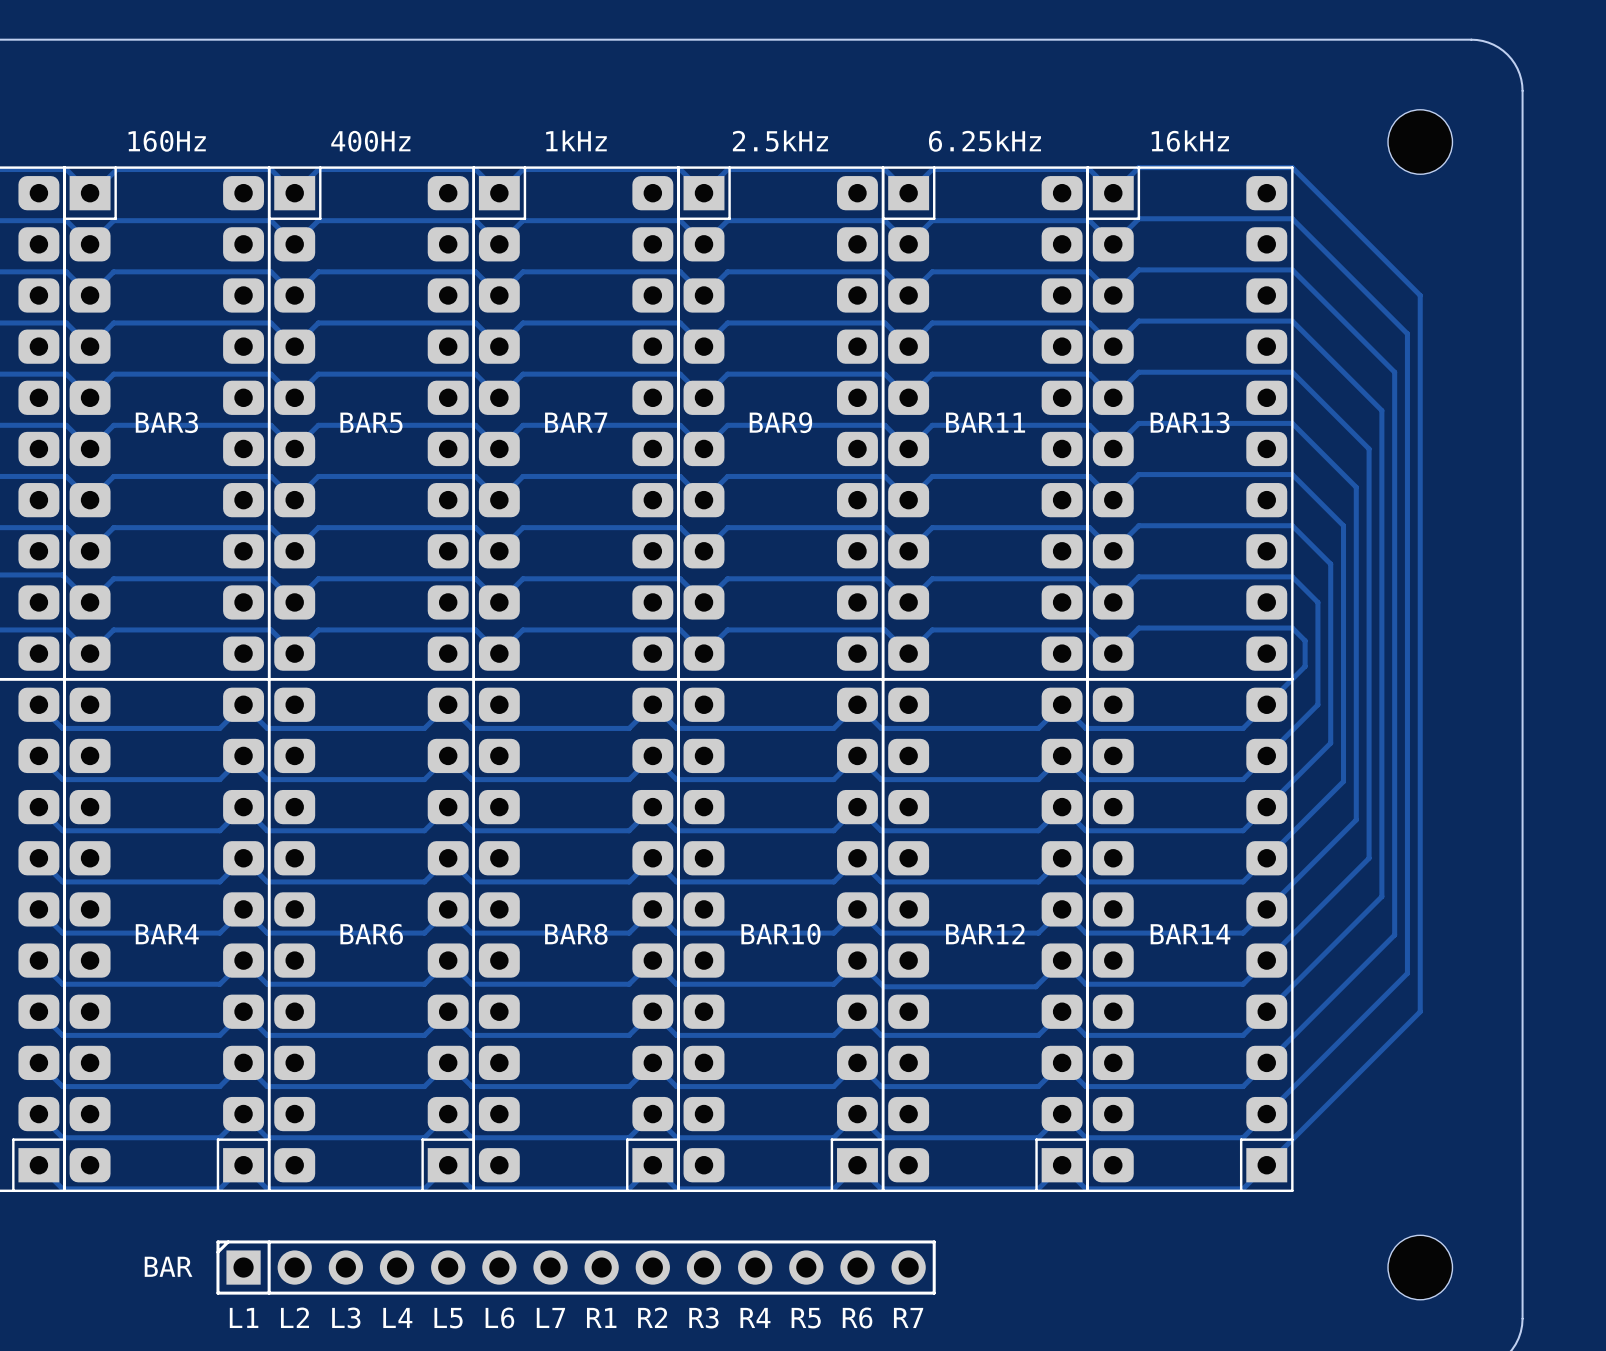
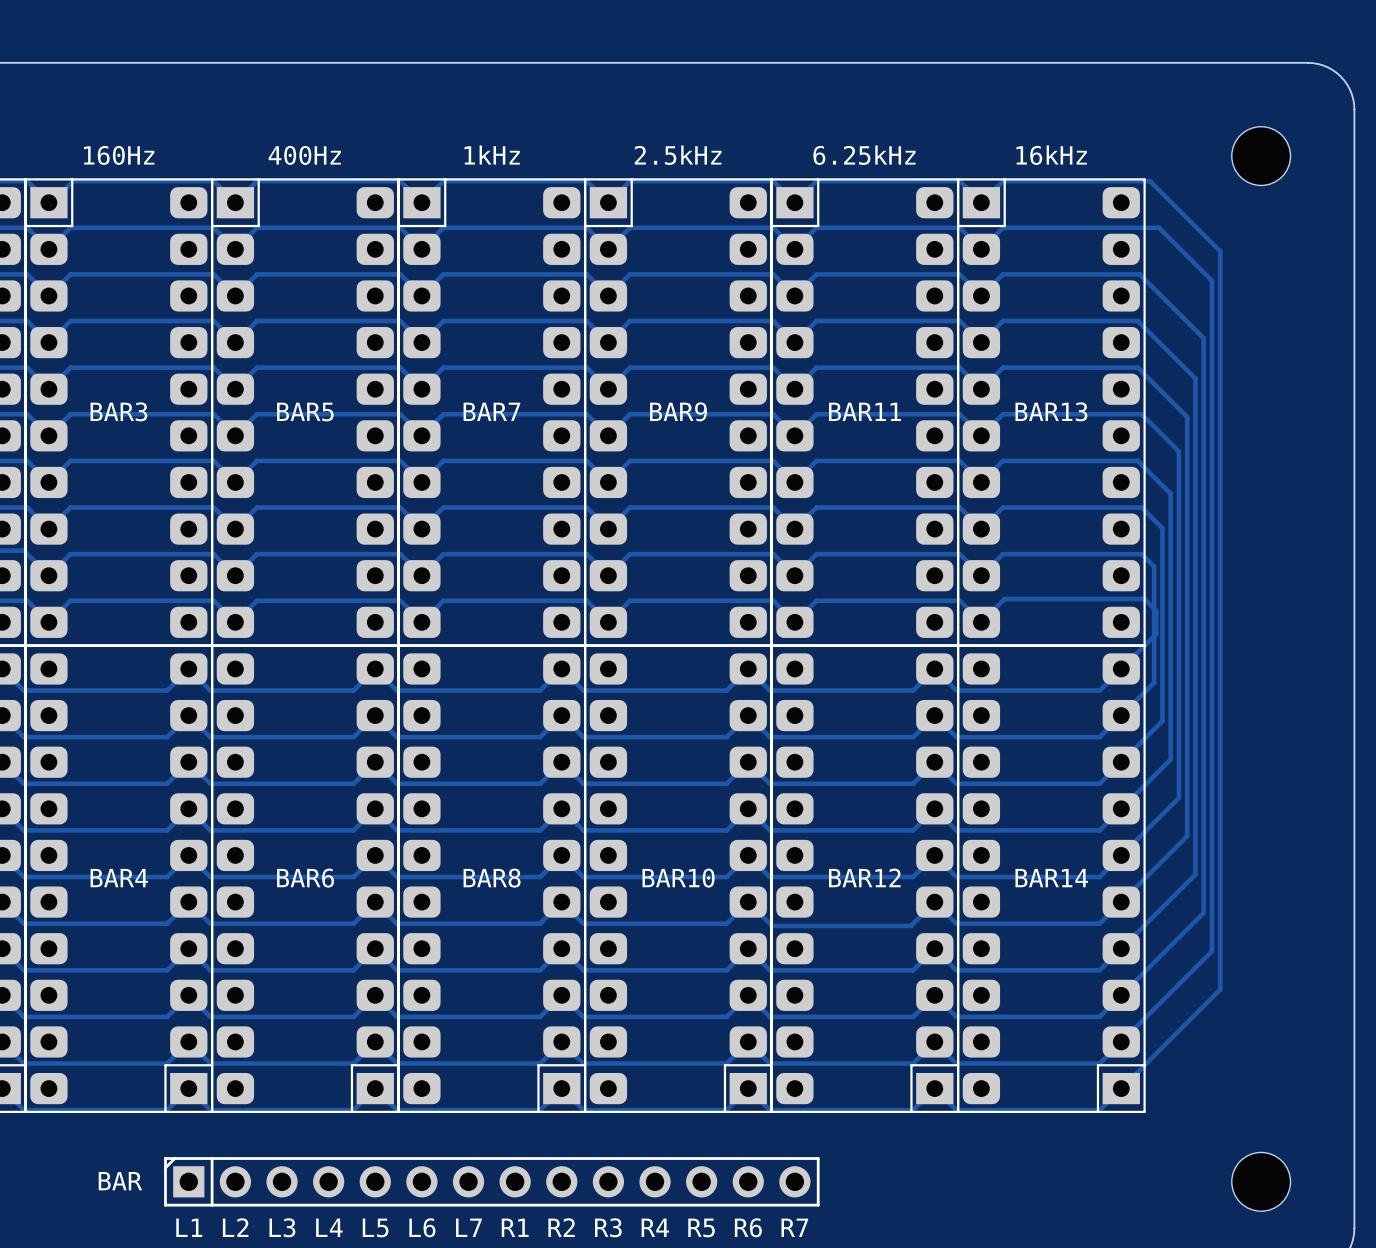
track: (1136, 169) (1138, 167) (1292, 167) (1420, 295) (1420, 1011) (1375, 1056) -> (1002, 181) (1150, 181) (1220, 251) (1220, 989)
track: (1136, 220) (1138, 218) (1292, 218) (1407, 333) (1407, 973) (1366, 1014) -> (1002, 227) (1158, 227) (1211, 280) (1211, 951)
track: (1136, 271) (1138, 269) (1292, 269) (1394, 372) (1394, 935) (1357, 972) -> (1002, 274) (1139, 274) (1203, 338) (1203, 912)
track: (1136, 322) (1138, 321) (1292, 321) (1381, 410) (1381, 896) (1348, 930) -> (1002, 321) (1137, 321) (1195, 378) (1195, 874)
track: (1136, 374) (1138, 372) (1292, 372) (1369, 448) (1369, 858) (1339, 888) -> (1002, 367) (1137, 367) (1187, 417) (1187, 836)
track: (1136, 425) (1138, 423) (1292, 423) (1356, 487) (1356, 819) (1330, 846) -> (1002, 414) (1141, 414) (1178, 451) (1178, 797)
track: (1136, 476) (1138, 474) (1292, 474) (1343, 525) (1343, 781) (1320, 804) -> (1002, 460) (1137, 460) (1170, 493) (1170, 759)
track: (1136, 527) (1138, 525) (1292, 525) (1330, 564) (1330, 743) (1311, 761) -> (1002, 507) (1141, 507) (1162, 528) (1162, 721)
track: (1136, 578) (1138, 576) (1292, 576) (1317, 602) (1317, 704) (1302, 719) -> (1002, 554) (1141, 554) (1154, 566) (1154, 682)

